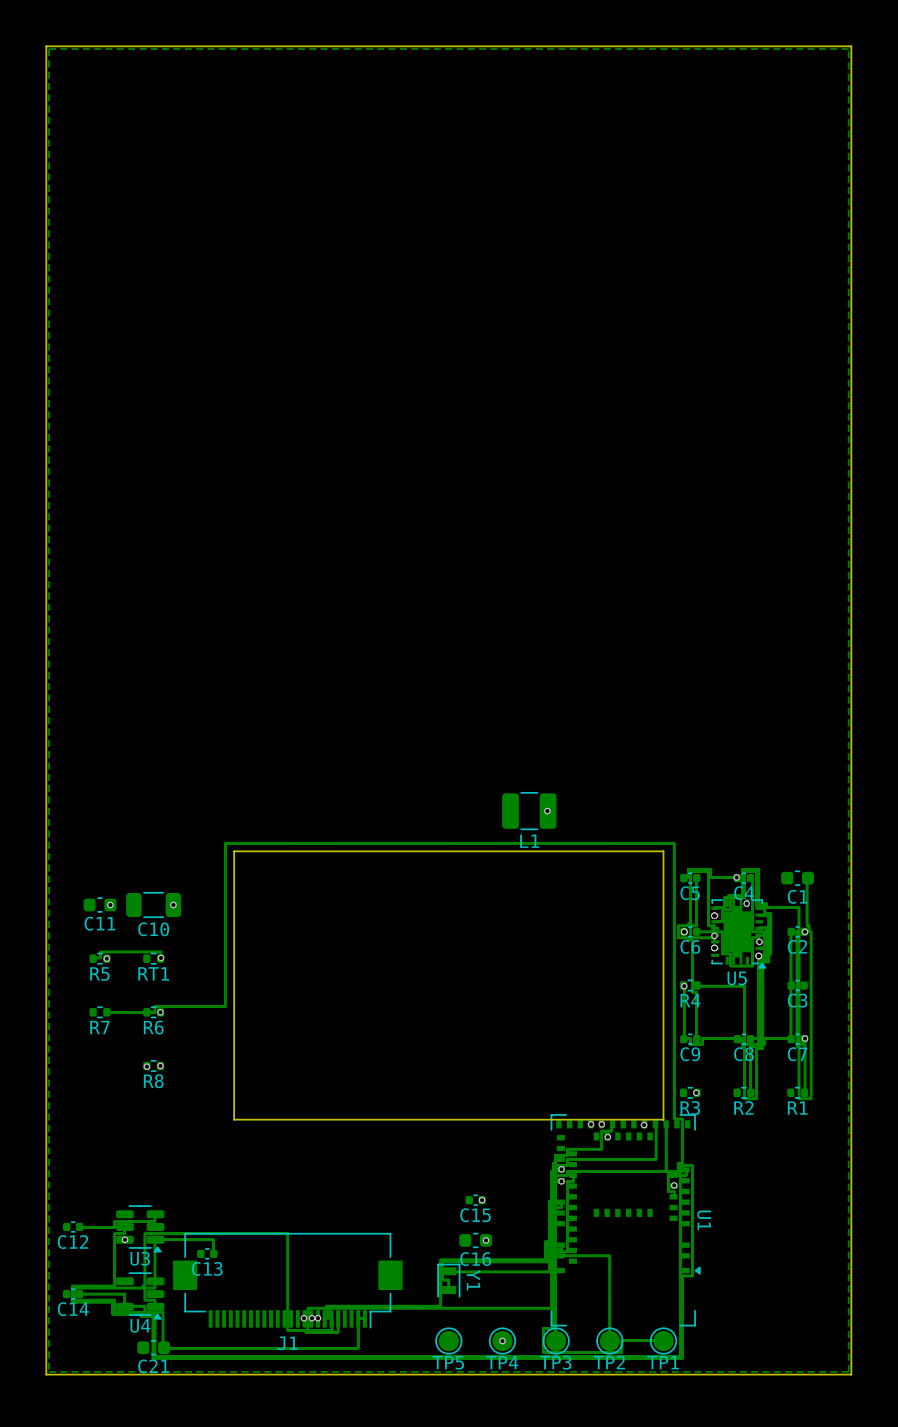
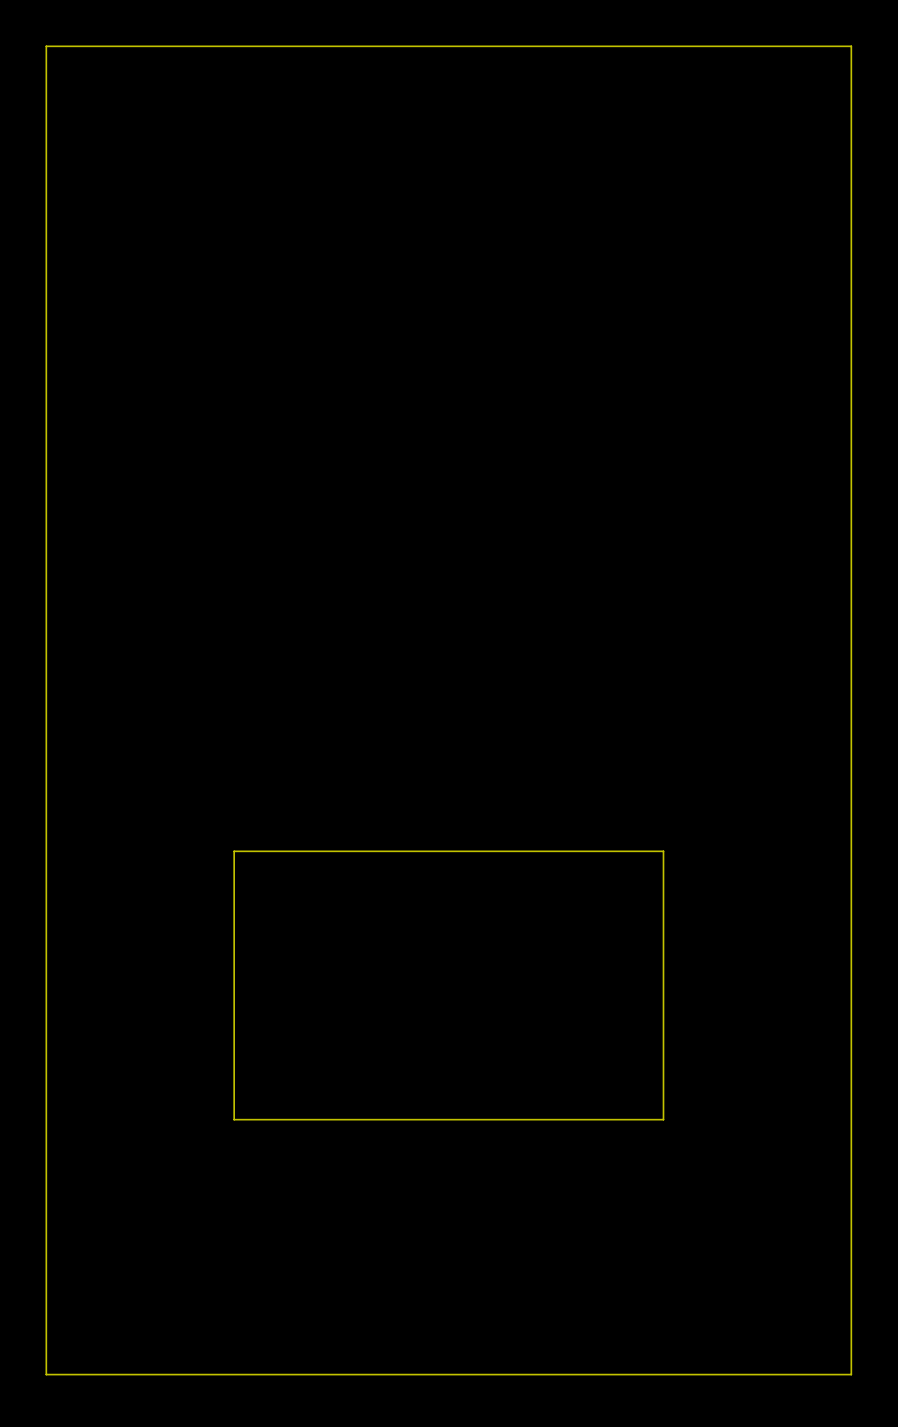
zone outline: (848, 49) (49, 49) (49, 1371) (848, 1371) (848, 49) -> none
L1: (529, 811) -> none
via: (547, 811) -> none
track: (696, 877) (696, 925) (690, 925) (690, 937) (714, 937) (714, 941) -> none
track: (736, 877) (710, 877) (710, 869) (688, 869) (688, 877) (684, 877) -> none
via: (736, 877) -> none
track: (750, 877) (752, 877) (752, 931) (764, 931) (764, 947) (758, 947) -> none
track: (807, 877) (807, 925) (809, 925) (809, 931) (811, 931) (811, 1098) (799, 1098) (796, 931) (790, 931) (790, 1038) (764, 1038) (762, 1048) (756, 1048) (756, 1098) (744, 1098) (744, 1046) (742, 1046) (742, 1038) (702, 1038) (702, 1044) (690, 1044) (690, 1038) (684, 1038) (684, 986) -> none
C5: (690, 878) -> none
C4: (743, 878) -> none
C1: (797, 878) -> none
via: (746, 903) -> none
C11: (99, 905) -> none
via: (110, 905) -> none
C10: (153, 905) -> none
via: (173, 905) -> none
track: (714, 907) (724, 907) (724, 897) (728, 897) (728, 895) (742, 895) (742, 869) (758, 869) (758, 903) (766, 903) (766, 907) (799, 907) (799, 1044) (805, 1044) (805, 1092) -> none
via: (714, 915) -> none
track: (758, 915) (768, 915) (768, 951) (766, 951) (766, 960) (760, 960) (760, 1040) (758, 1040) (758, 1044) (744, 1044) (744, 986) (696, 986) -> none
track: (714, 921) (722, 921) (722, 909) (730, 909) (730, 897) (744, 897) (744, 871) (756, 871) (756, 905) (764, 905) (764, 913) (770, 913) (770, 953) (768, 953) (768, 962) (762, 962) (762, 1042) (760, 1042) (760, 1046) (750, 1046) (750, 1092) -> none
track: (714, 927) (714, 925) (708, 925) (708, 871) (690, 871) (690, 923) (688, 925) (678, 925) (678, 937) (692, 939) (692, 992) (696, 992) (696, 1038) -> none
track: (758, 927) (766, 927) (766, 949) (764, 949) (764, 957) (758, 957) (758, 1038) (750, 1038) -> none
via: (684, 931) -> none
C6: (690, 931) -> none
track: (696, 931) (722, 931) (722, 953) (730, 953) (730, 966) (752, 966) (752, 937) (758, 937) (758, 935) -> none
C2: (797, 931) -> none
via: (805, 931) -> none
U5: (738, 933) -> none
via: (714, 935) -> none
via: (759, 941) -> none
via: (714, 947) -> none
via: (758, 955) -> none
track: (161, 957) (161, 951) (100, 951) (100, 957) (92, 957) -> none
via: (161, 957) -> none
R5: (99, 958) -> none
via: (106, 958) -> none
RT1: (153, 958) -> none
R4: (690, 985) -> none
C3: (797, 985) -> none
via: (684, 986) -> none
R7: (99, 1012) -> none
track: (106, 1012) (154, 1012) (154, 1006) (225, 1006) (225, 843) (674, 843) (674, 1118) (682, 1118) (682, 1163) (678, 1163) (678, 1171) (668, 1171) (668, 1191) (674, 1191) (674, 1197) -> none
R6: (153, 1012) -> none
via: (160, 1012) -> none
via: (805, 1038) -> none
C9: (690, 1039) -> none
C8: (743, 1039) -> none
C7: (797, 1039) -> none
via: (146, 1066) -> none
R8: (153, 1066) -> none
via: (160, 1066) -> none
R3: (690, 1092) -> none
via: (696, 1092) -> none
R2: (743, 1092) -> none
R1: (797, 1092) -> none
via: (591, 1124) -> none
via: (601, 1124) -> none
track: (611, 1125) (611, 1131) (601, 1131) (601, 1149) (567, 1149) (567, 1155) (555, 1155) (555, 1163) (553, 1163) (553, 1171) (551, 1171) (549, 1241) (545, 1241) (545, 1259) (440, 1259) (440, 1306) (326, 1306) (326, 1308) (307, 1308) (307, 1330) (332, 1330) (332, 1318) -> none
via: (644, 1125) -> none
track: (656, 1125) (656, 1159) (567, 1159) (567, 1165) (555, 1165) (555, 1173) (553, 1173) (553, 1203) (551, 1203) (551, 1243) (547, 1243) (547, 1261) (442, 1261) (442, 1280) (448, 1280) (448, 1290) -> none
track: (666, 1125) (666, 1171) (567, 1171) (567, 1175) (555, 1175) (553, 1245) (549, 1245) (549, 1271) (448, 1271) -> none
via: (607, 1137) -> none
via: (561, 1169) -> none
track: (686, 1169) (686, 1175) (680, 1175) (680, 1356) (154, 1356) (154, 1314) (114, 1312) (114, 1300) (74, 1300) (74, 1288) (142, 1288) (144, 1286) (144, 1233) (287, 1233) (287, 1330) (338, 1332) (338, 1318) -> none
track: (573, 1175) (573, 1181) (567, 1181) (567, 1251) (555, 1251) (555, 1340) -> none
track: (674, 1175) (680, 1173) (680, 1165) (692, 1165) (692, 1275) (682, 1275) (682, 1358) (152, 1358) (152, 1316) (112, 1314) (112, 1302) (72, 1302) (72, 1286) (114, 1286) (114, 1233) (124, 1233) (124, 1227) -> none
via: (561, 1181) -> none
via: (674, 1185) -> none
C15: (475, 1200) -> none
via: (482, 1200) -> none
track: (561, 1201) (561, 1207) (555, 1207) (555, 1247) (551, 1247) (551, 1308) (328, 1308) (328, 1318) (324, 1318) -> none
track: (154, 1213) (154, 1221) (114, 1221) (114, 1227) (80, 1227) -> none
U1: (625, 1220) -> none
C12: (73, 1227) -> none
U3: (140, 1228) -> none
via: (124, 1239) -> none
C16: (475, 1240) -> none
via: (486, 1240) -> none
track: (561, 1245) (561, 1249) (553, 1249) (553, 1328) (543, 1328) (543, 1352) (621, 1352) (621, 1340) (664, 1340) -> none
C13: (207, 1253) -> none
track: (213, 1253) (213, 1239) (154, 1239) (154, 1288) (144, 1288) (144, 1300) (154, 1300) (154, 1306) -> none
track: (561, 1255) (609, 1255) (609, 1340) -> none
J1: (287, 1280) -> none
Y1: (448, 1280) -> none
C14: (73, 1294) -> none
track: (80, 1294) (124, 1294) (124, 1306) (144, 1306) (144, 1312) (163, 1312) (163, 1348) (358, 1348) (358, 1318) (364, 1318) -> none
U4: (140, 1295) -> none
via: (303, 1318) -> none
via: (311, 1318) -> none
via: (318, 1318) -> none
TP5: (448, 1341) -> none
TP4: (502, 1341) -> none
via: (502, 1341) -> none
TP3: (556, 1341) -> none
TP2: (609, 1341) -> none
TP1: (663, 1341) -> none
C21: (153, 1347) -> none

